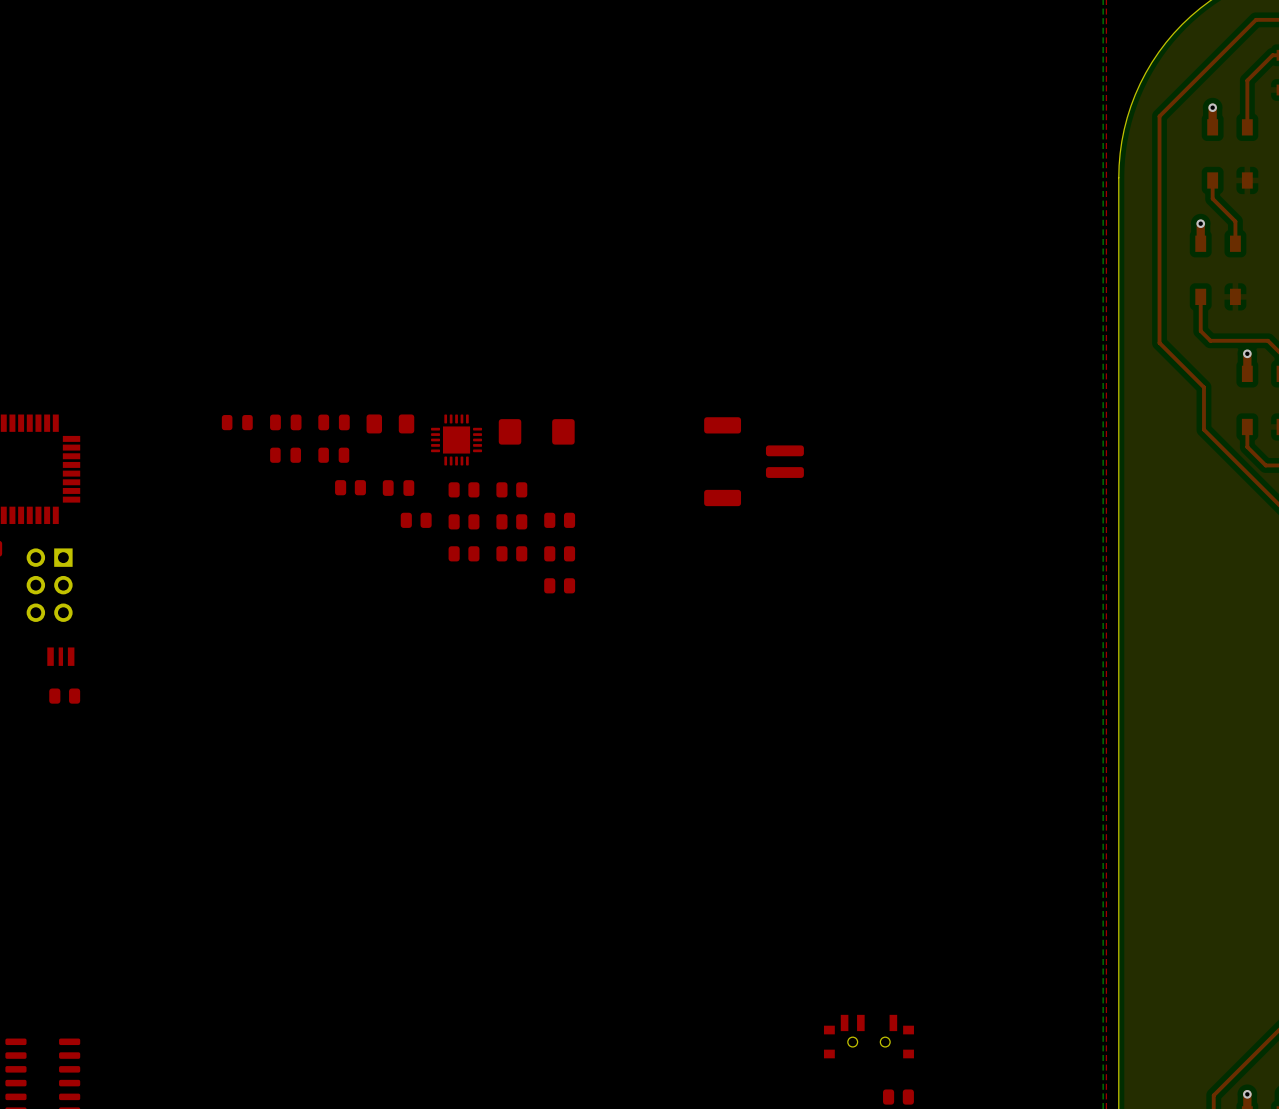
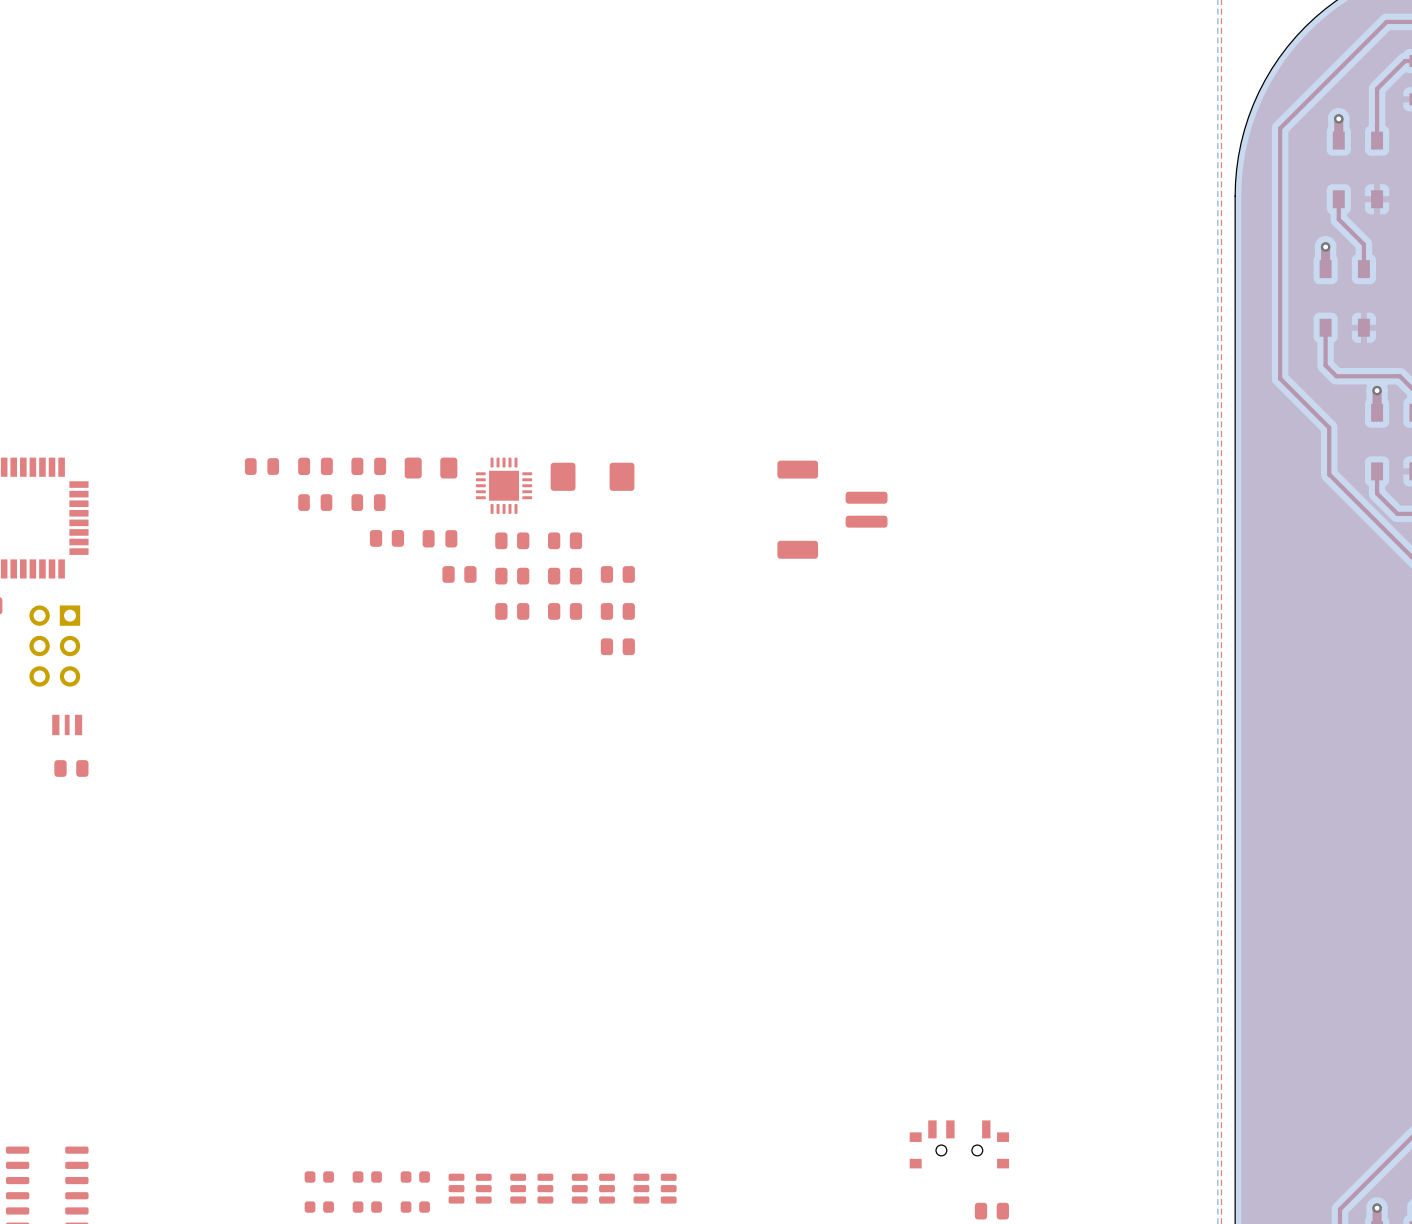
part: none -> (319, 1177)
part: none -> (367, 1177)
part: none -> (415, 1177)
part: none -> (470, 1188)
part: none -> (531, 1188)
part: none -> (593, 1188)
part: none -> (655, 1188)
part: none -> (319, 1207)
part: none -> (367, 1207)
part: none -> (415, 1207)

